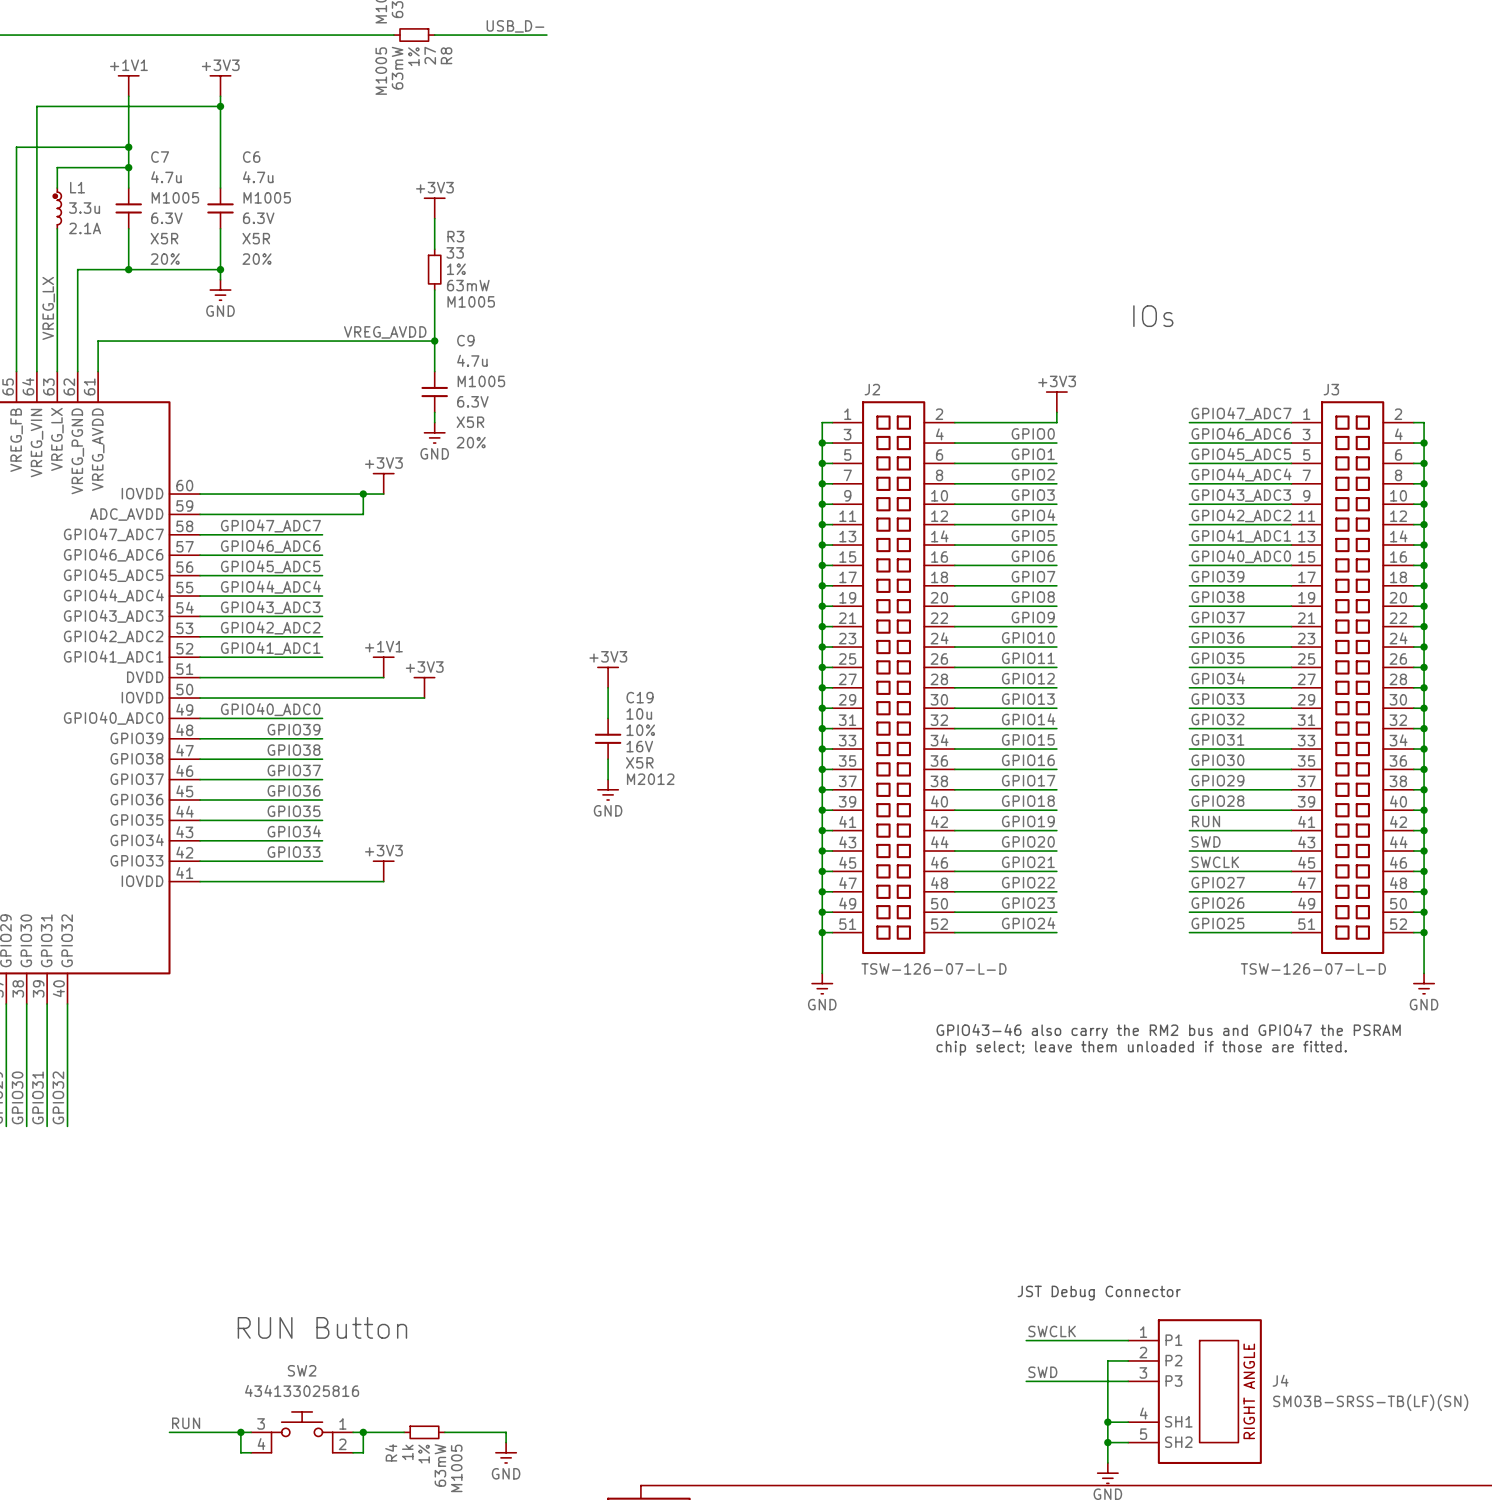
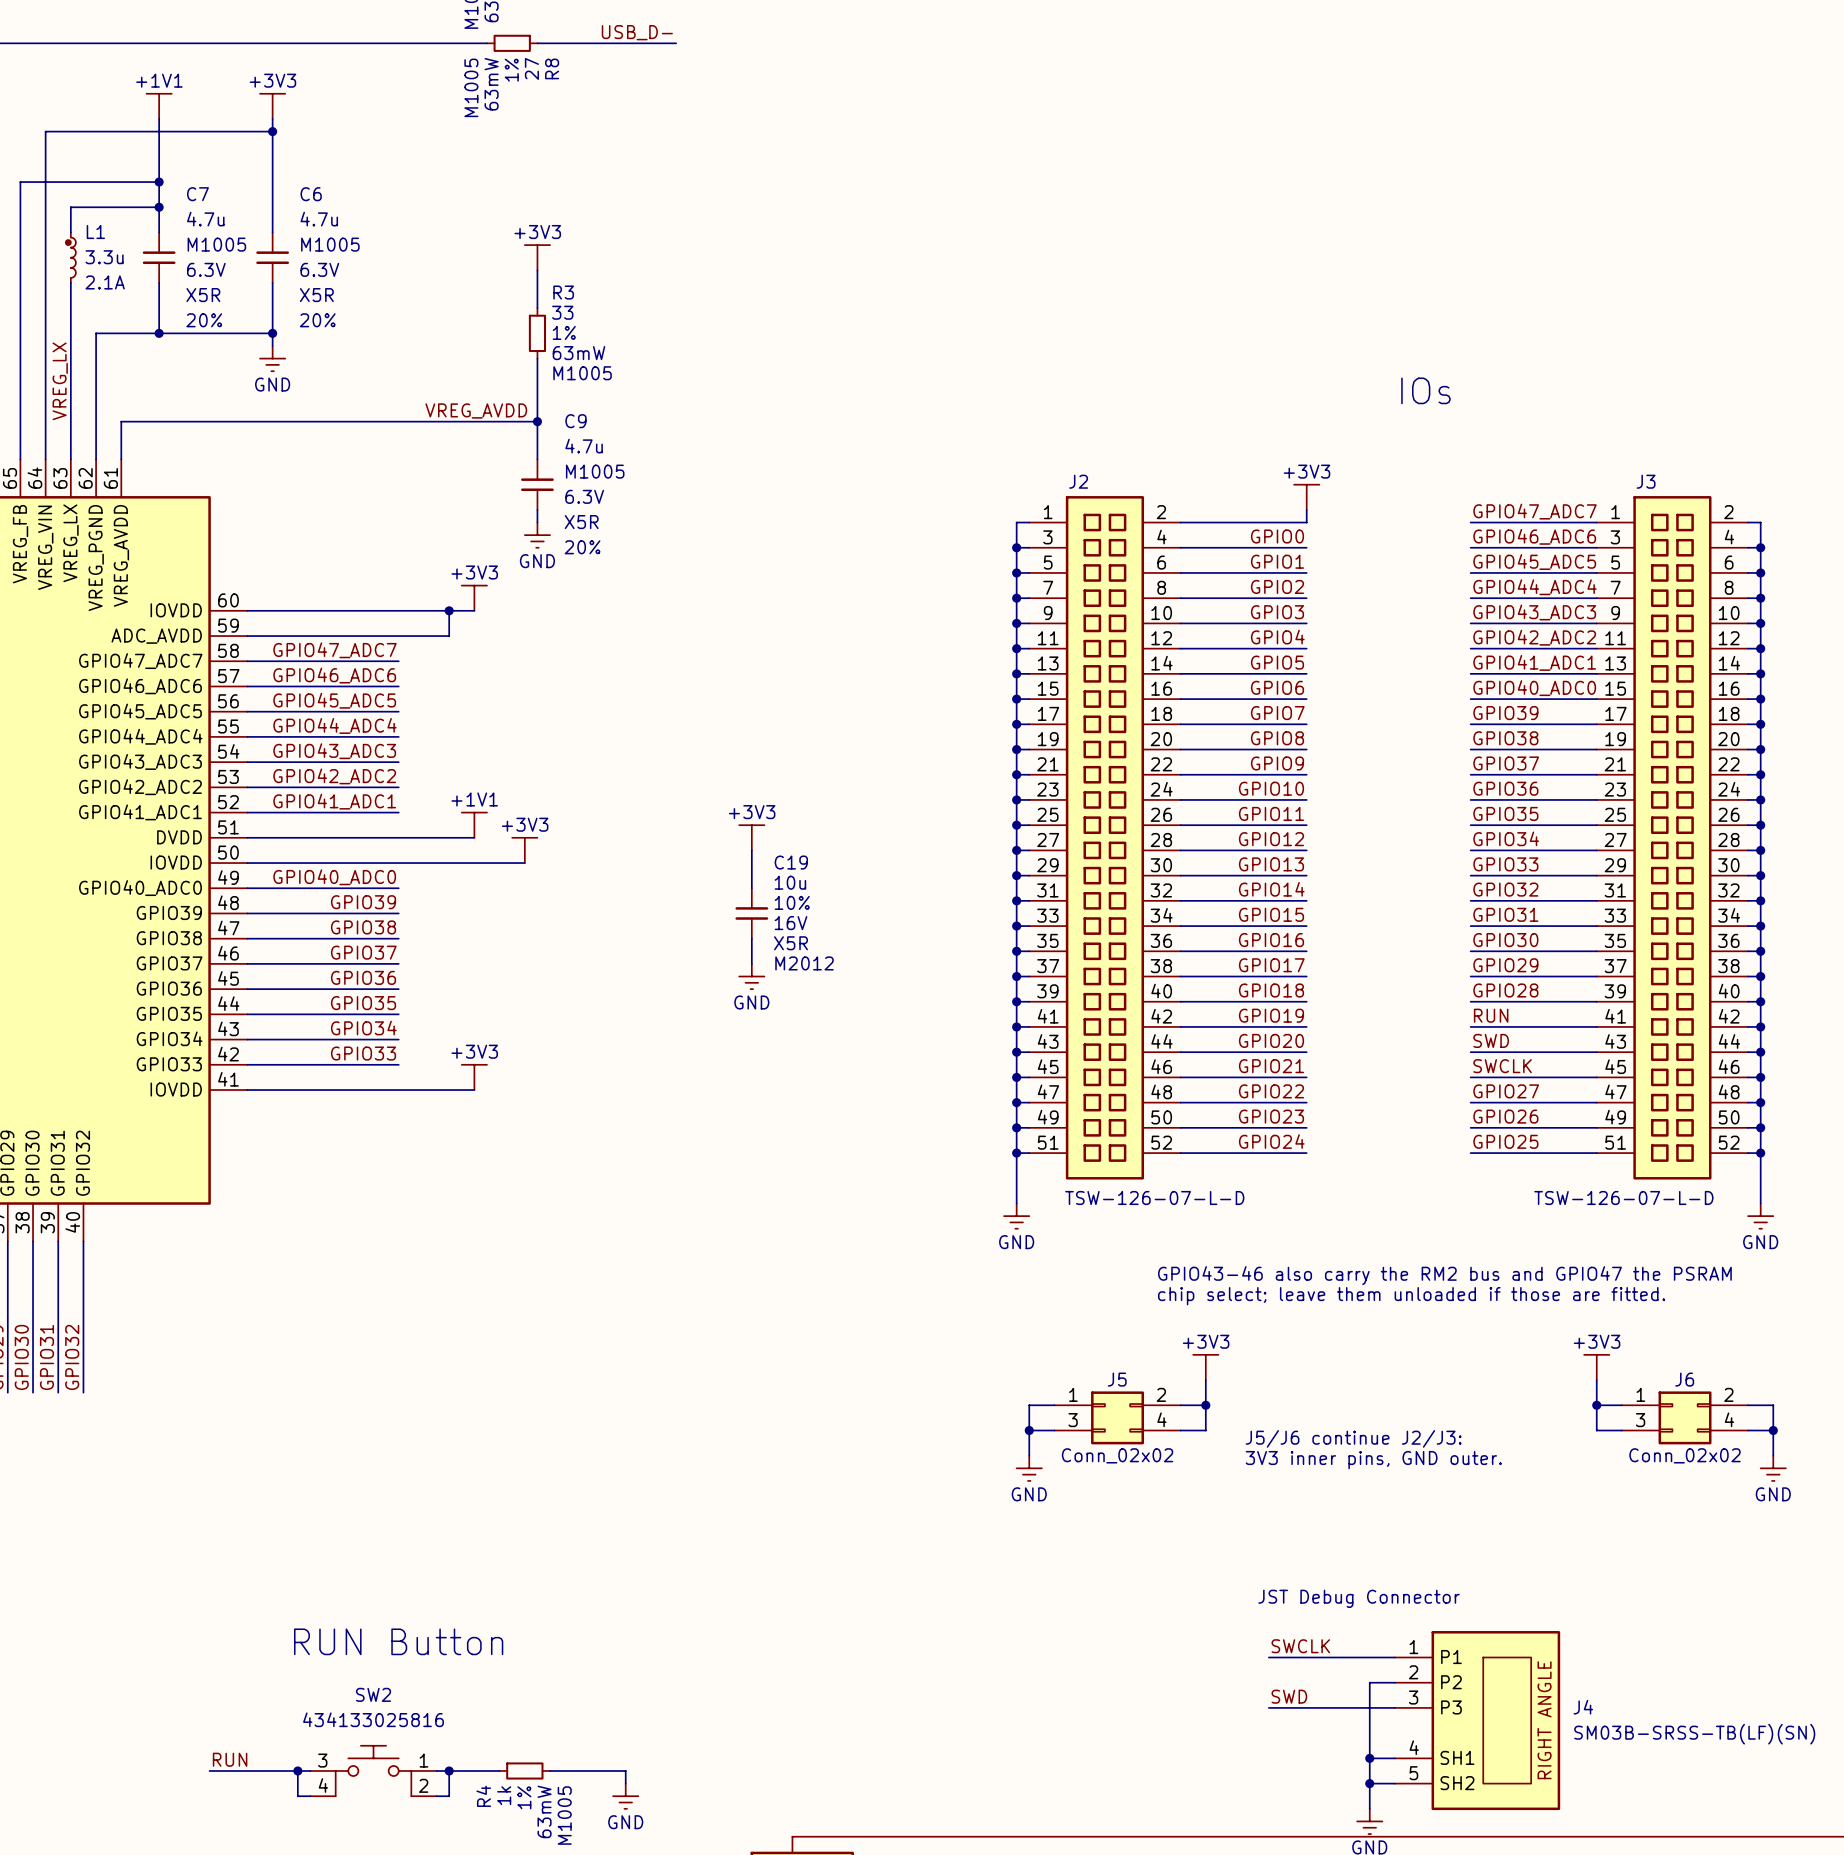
power symbol: none -> +3V3 (1205, 1367)
power symbol: none -> +3V3 (1596, 1367)
wire: none -> (1205, 1380) (1205, 1430) (1180, 1430)
wire: none -> (1596, 1380) (1596, 1430) (1621, 1430)
wire: none -> (1054, 1405) (1029, 1405) (1029, 1455)
wire: none -> (1180, 1405) (1205, 1405)
junction: none -> (1205, 1405)
wire: none -> (1596, 1405) (1621, 1405)
junction: none -> (1596, 1405)
wire: none -> (1748, 1405) (1773, 1405) (1773, 1455)
J5: none -> Conn_02x02 (1117, 1417)
J6: none -> Conn_02x02 (1685, 1417)
wire: none -> (1029, 1430) (1054, 1430)
junction: none -> (1029, 1430)
wire: none -> (1748, 1430) (1773, 1430)
junction: none -> (1773, 1430)
text: none -> J5/J6 continue J2/J3: (1353, 1438)
text: none -> 3V3 inner pins, GND outer. (1373, 1460)
power symbol: none -> GND (1029, 1468)
power symbol: none -> GND (1773, 1468)

